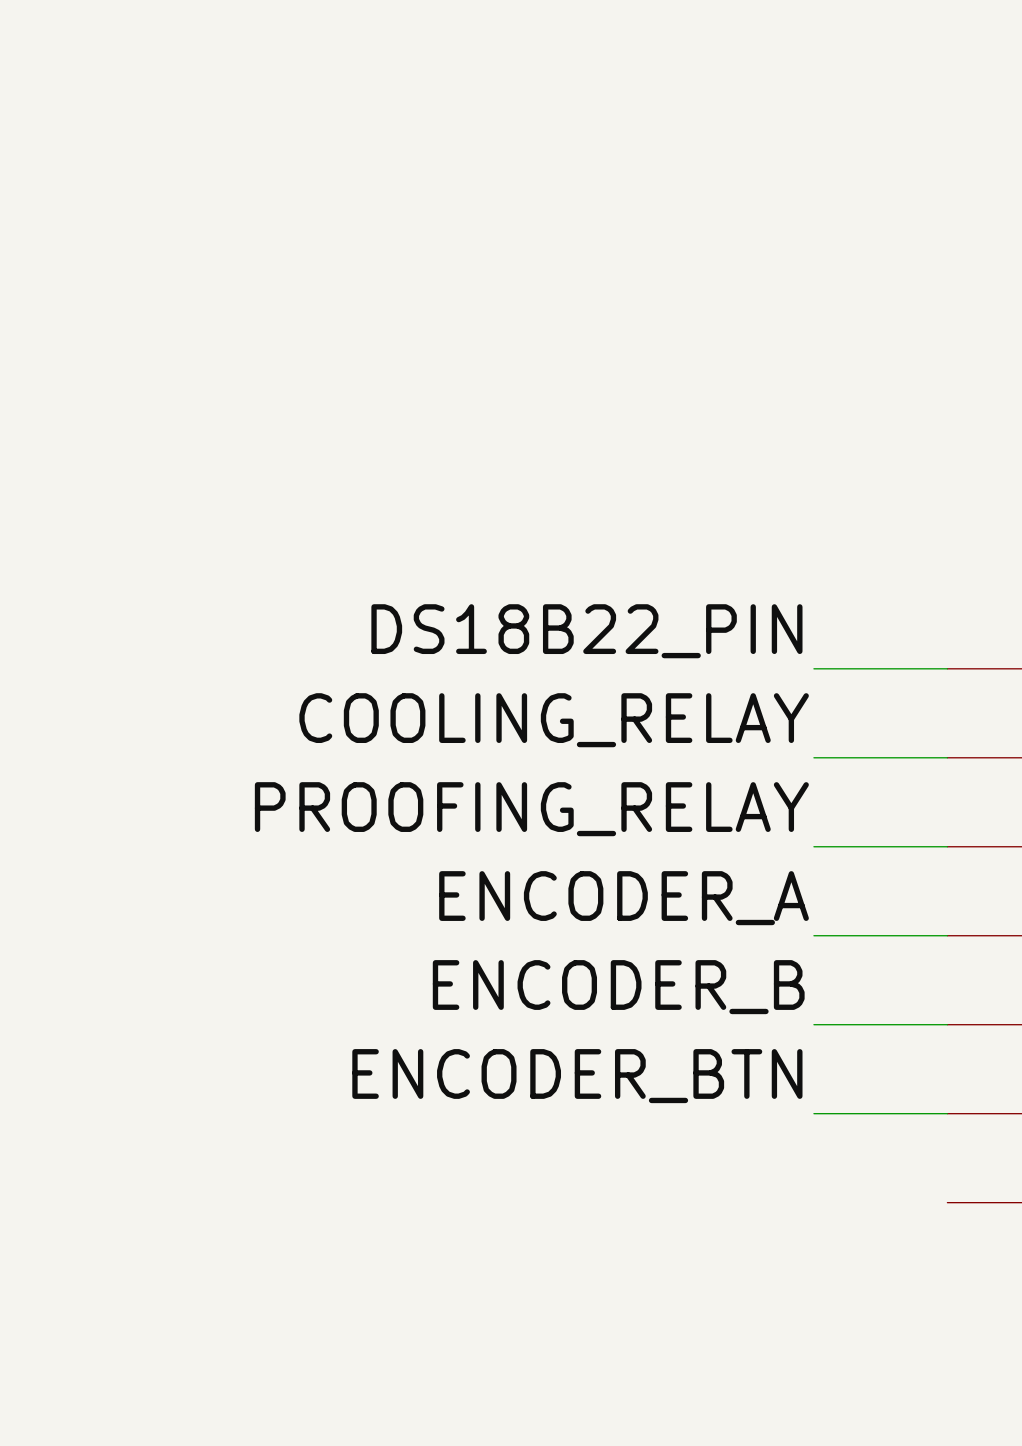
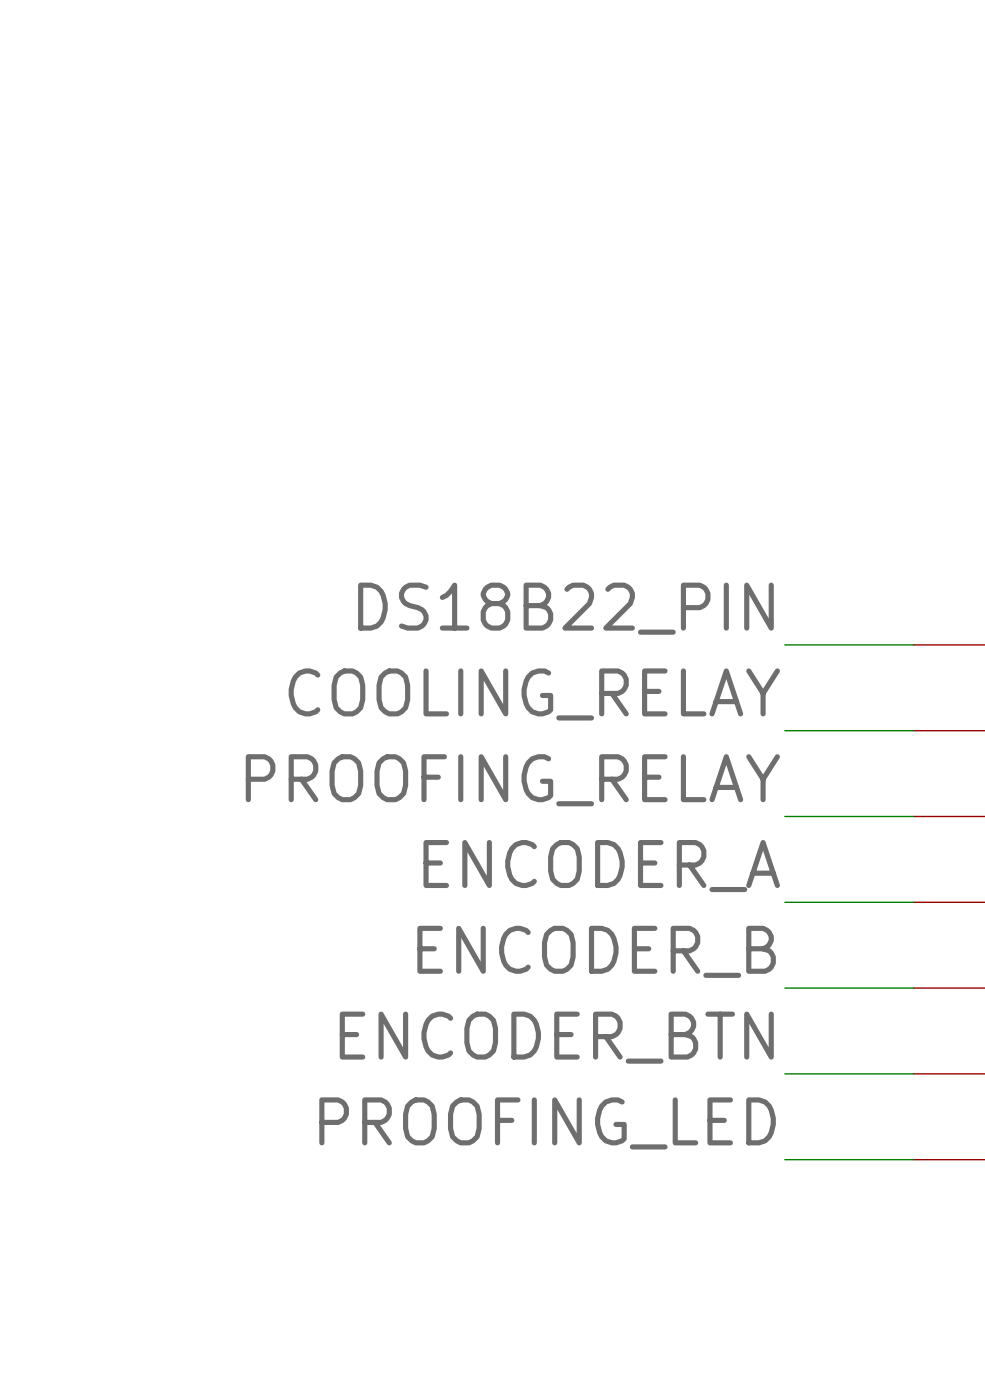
label: none -> PROOFING_LED (547, 1123)
wire: none -> (784, 1159) (913, 1159)

